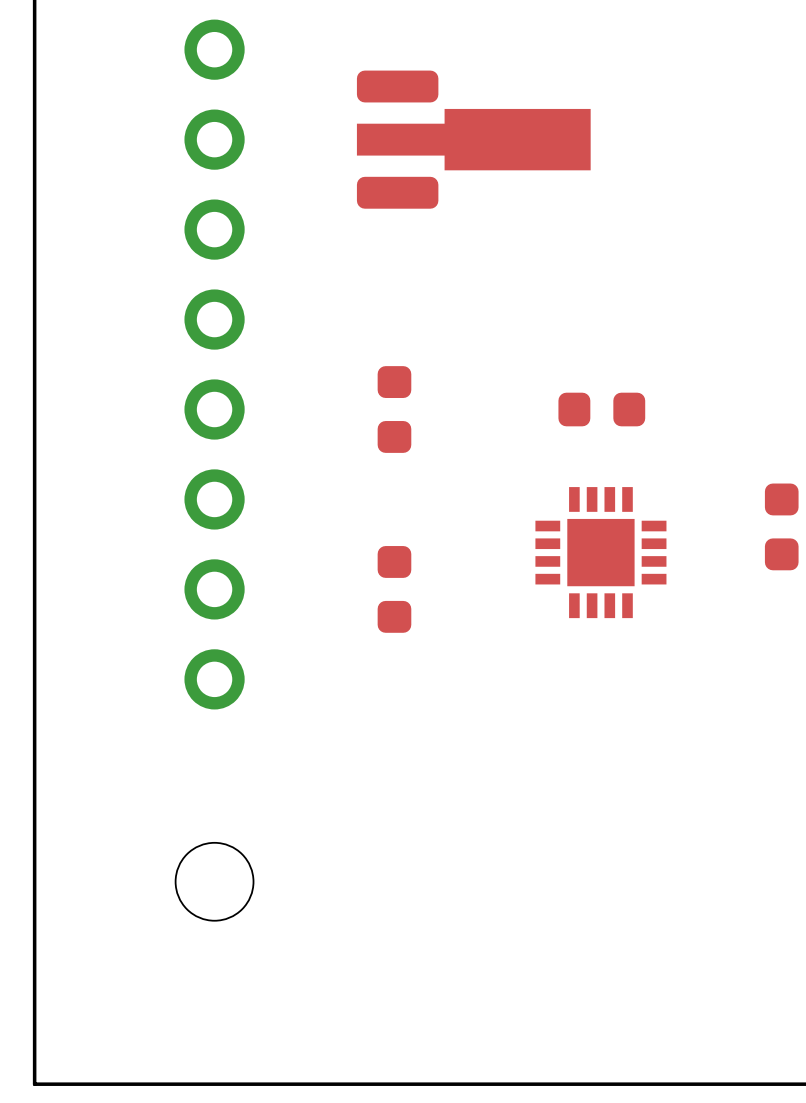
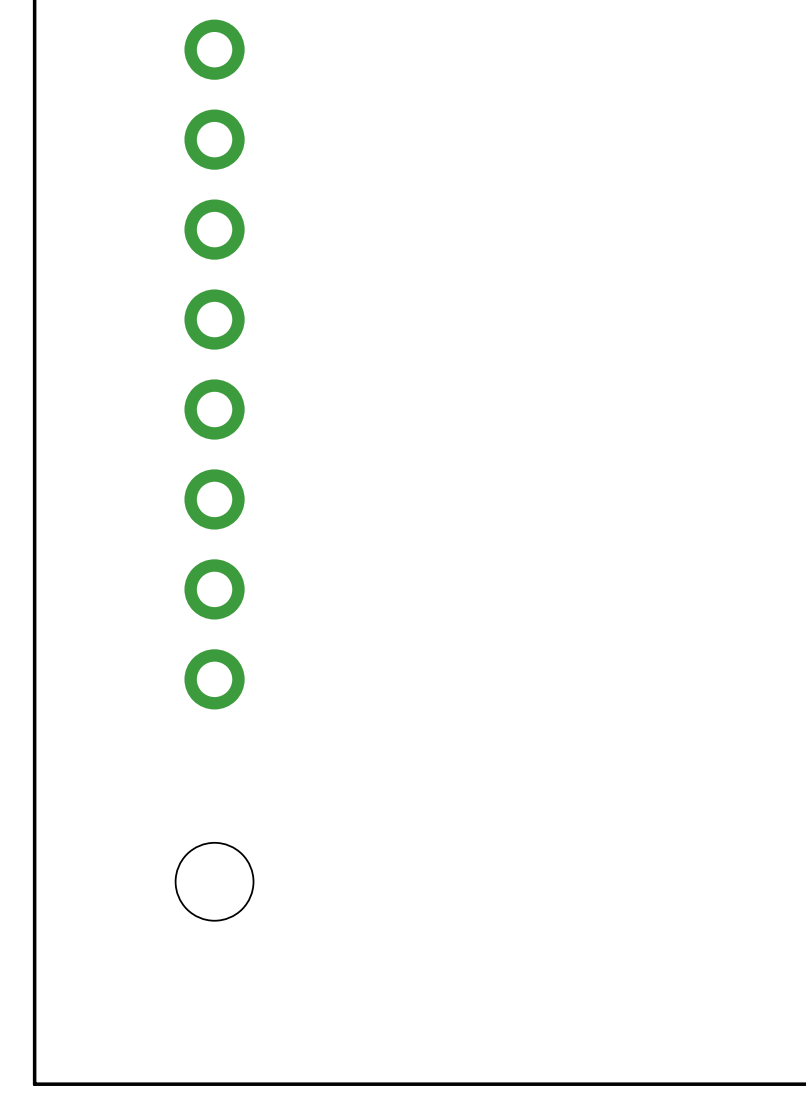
part: (473, 139) -> none
part: (394, 409) -> none
part: (601, 409) -> none
part: (781, 526) -> none
part: (600, 552) -> none
part: (394, 589) -> none

